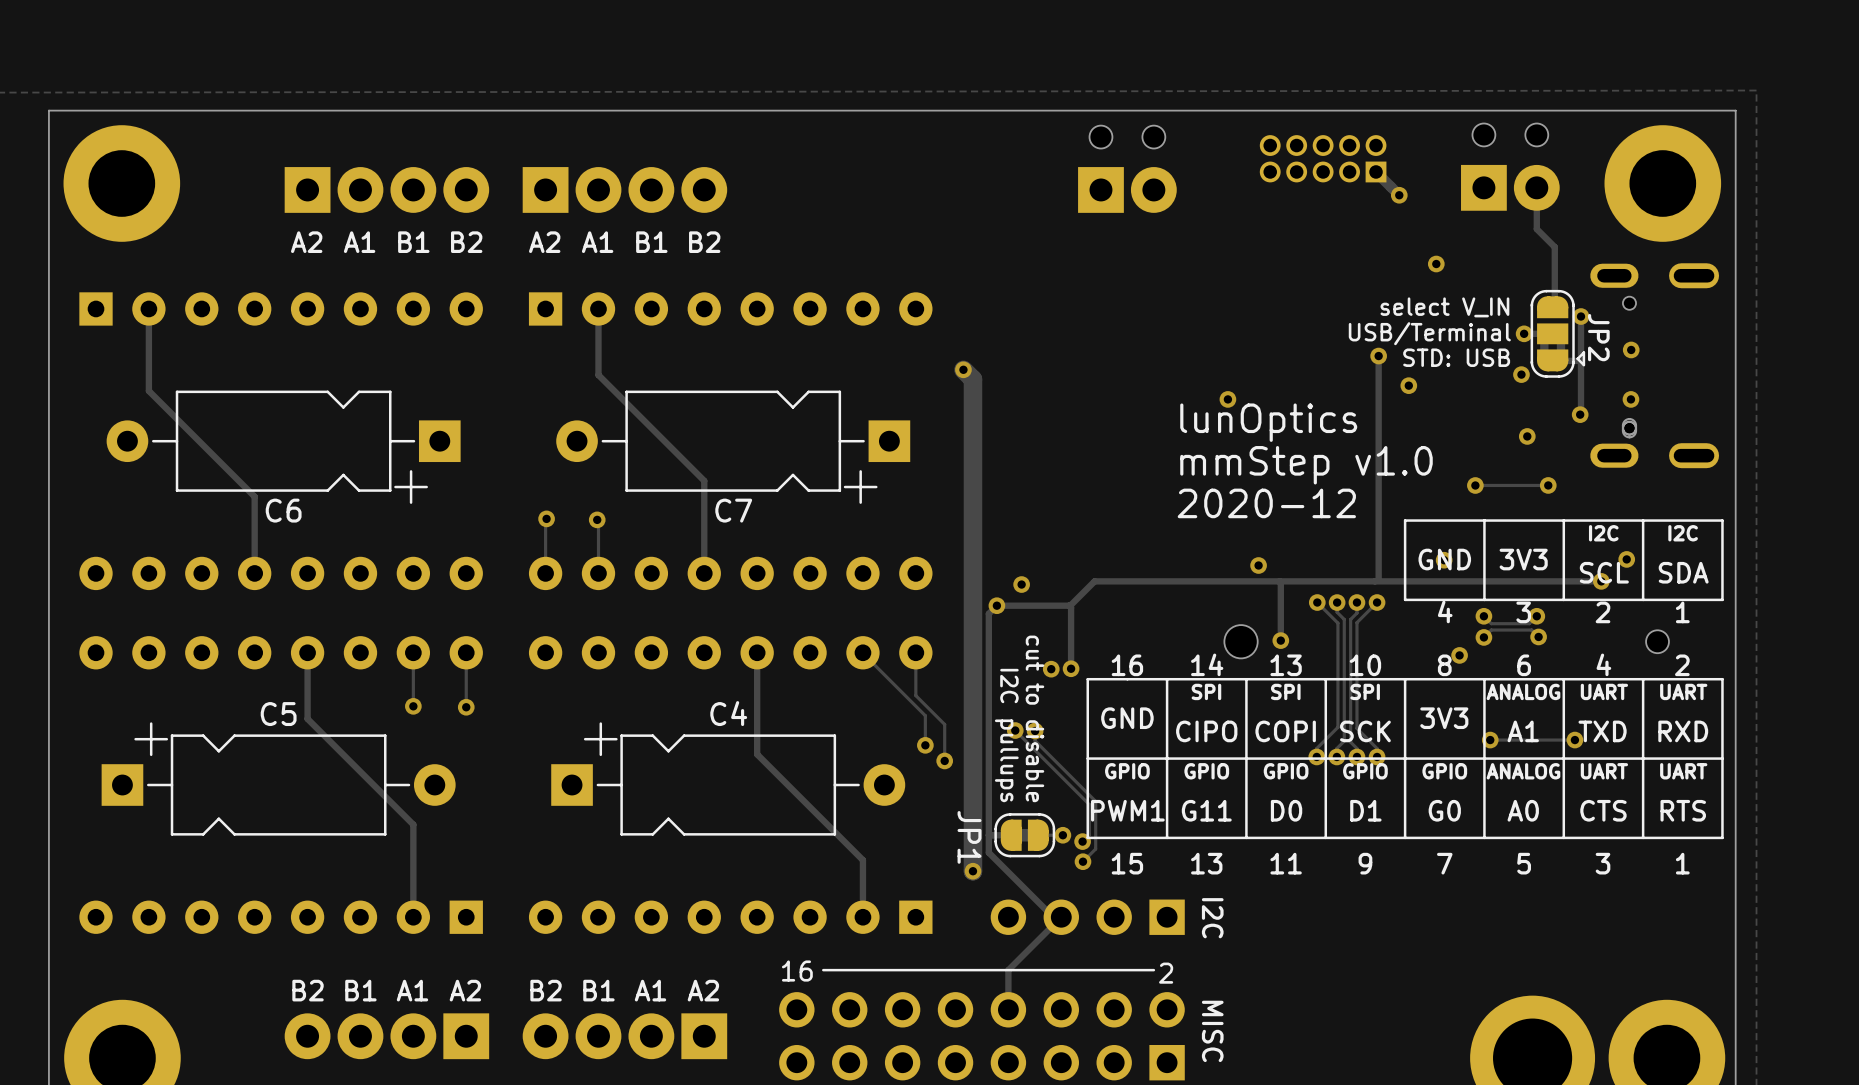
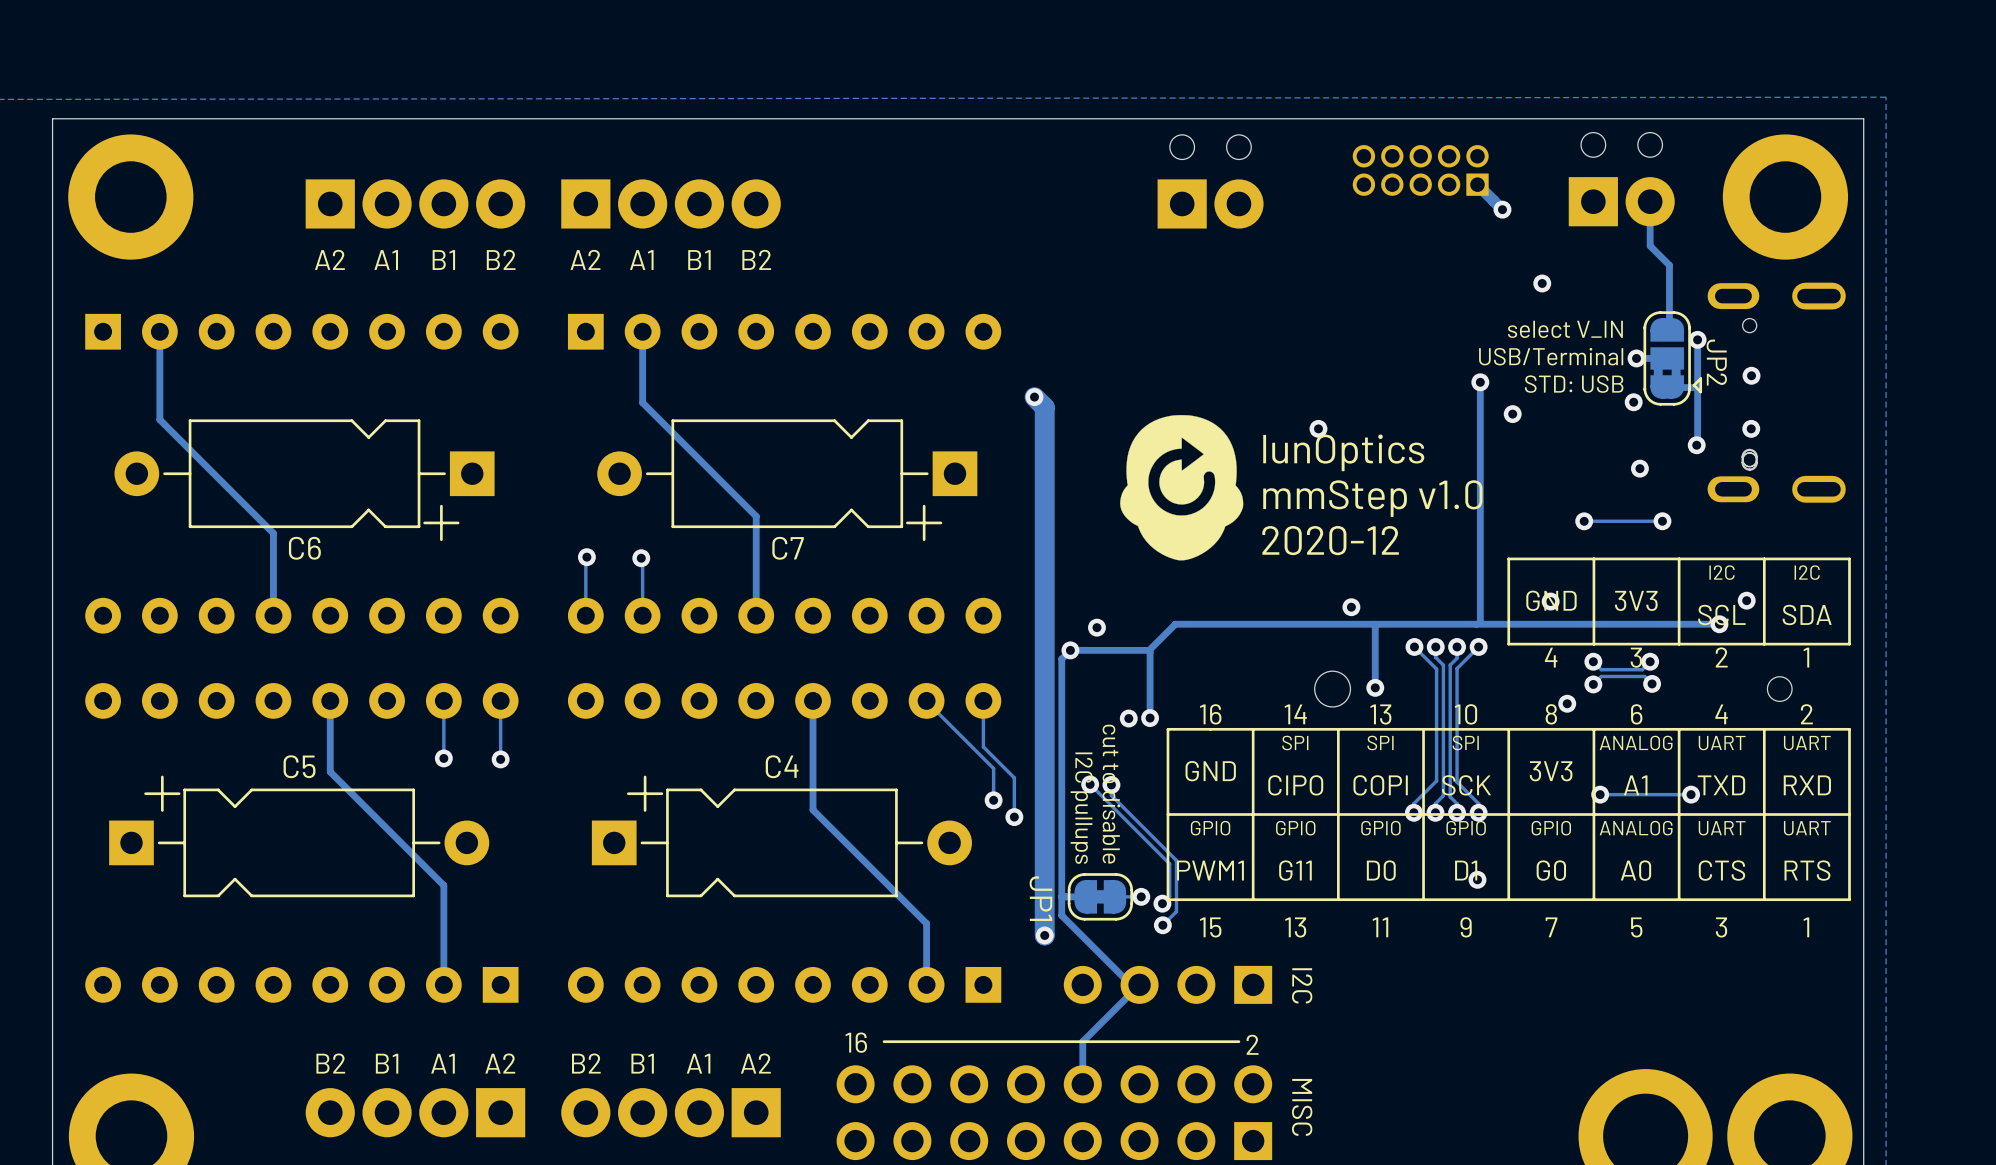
drawing: none -> [1120, 415, 1244, 561]
via: none -> (1477, 879)

